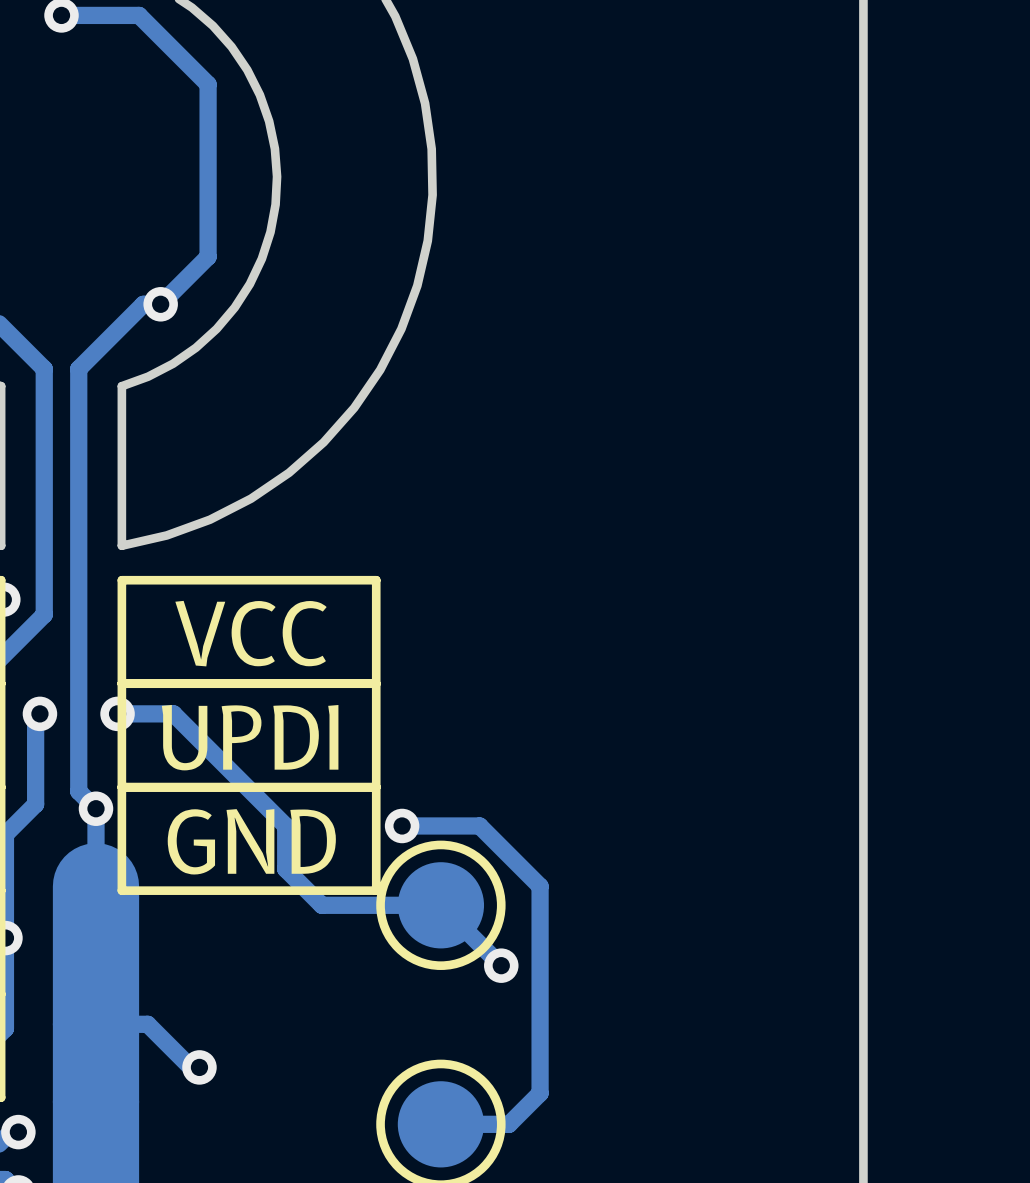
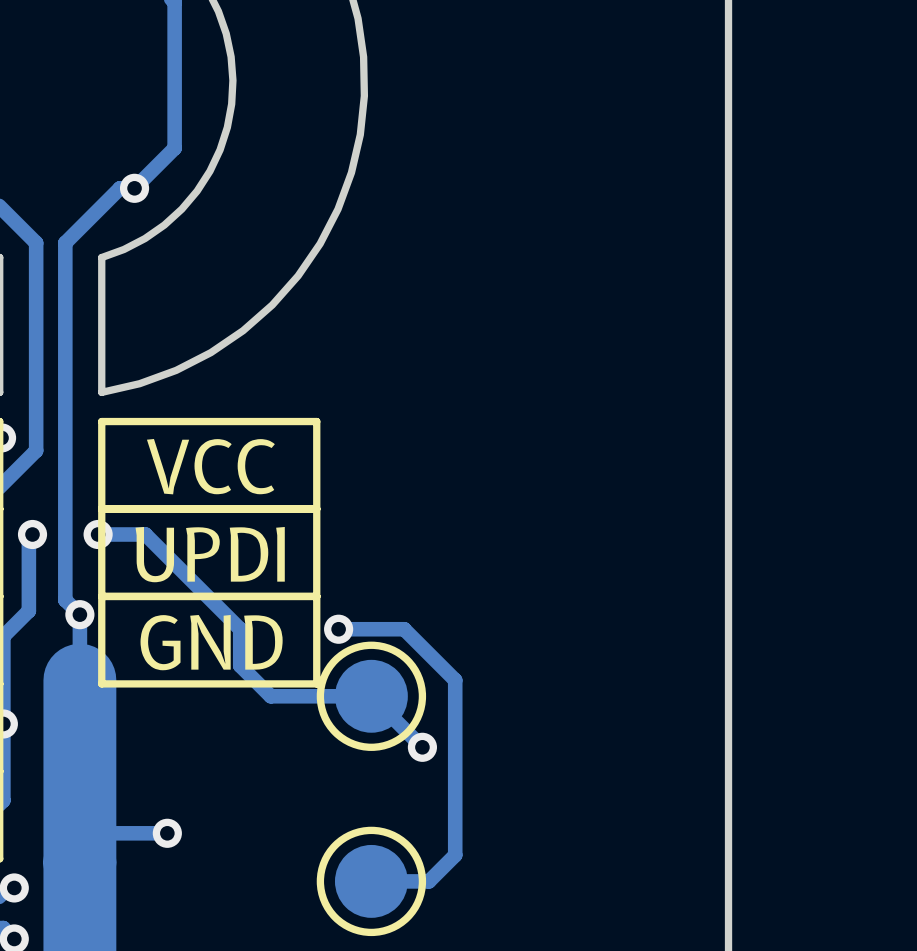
track: (95, 1024) (147, 1024) (190, 1067) -> (109, 833) (160, 833)

